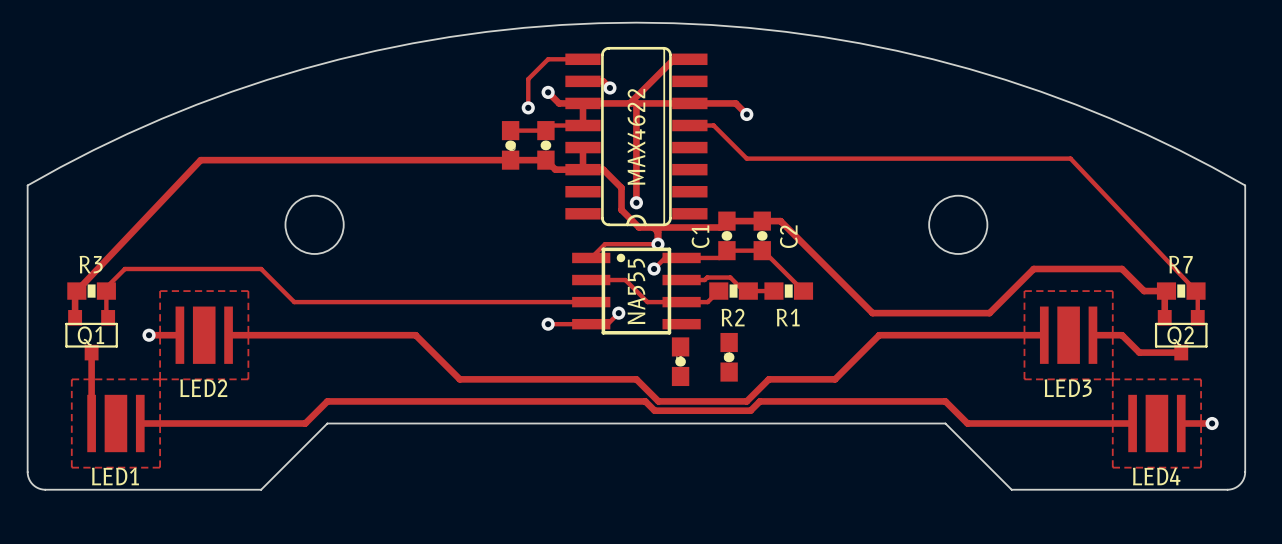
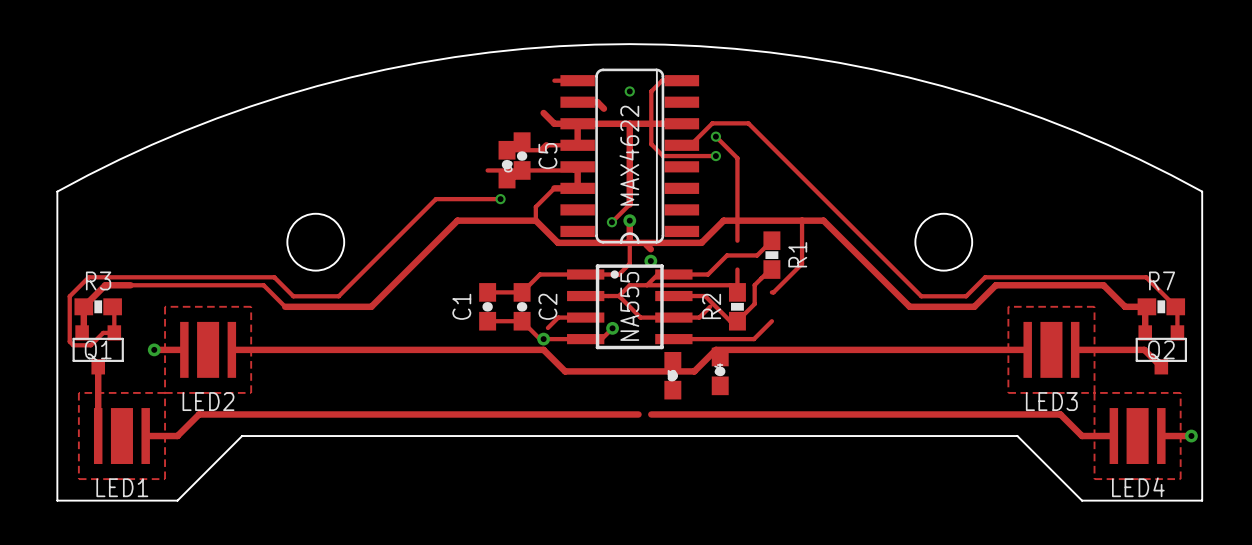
track: (559, 59) (548, 59) (528, 79) (528, 107) -> none
track: (673, 59) (629, 103) -> (666, 80) (662, 80) (651, 91) (651, 144) (663, 156) (715, 156)
via: none -> (629, 91)
via: (609, 87) -> none
via: (548, 92) -> none
track: (689, 103) (735, 103) (746, 114) -> none
via: (528, 107) -> none
via: (746, 114) -> none
track: none -> (715, 136) (737, 158) (737, 240)
via: none -> (715, 136)
track: (698, 125) (713, 125) (746, 158) (1070, 158) (1196, 291) -> (690, 145) (712, 123) (748, 123) (921, 296) (966, 296) (985, 277) (1146, 277) (1175, 306)
C5: none -> (522, 156)
via: none -> (715, 156)
part: (545, 145) -> none
track: none -> (577, 166) (574, 170) (487, 170)
track: (559, 169) (555, 169) (545, 160) (200, 160) (75, 292) (75, 317) -> (554, 188) (535, 206) (535, 220)
track: (583, 169) (603, 169) (621, 187) (621, 209) (639, 227) (720, 227) (726, 221) (780, 221) (872, 313) (989, 313) (1033, 268) -> (535, 220) (558, 242) (701, 242) (723, 220) (823, 220) (909, 306) (974, 306) (995, 285) (1017, 285)
track: none -> (500, 199) (435, 199) (338, 296) (293, 296) (274, 277) (88, 277) (69, 296) (69, 341) (73, 345) (90, 345) (103, 332) (114, 332) (114, 308) (112, 306)
via: none -> (500, 199)
track: (636, 186) (636, 202) -> (629, 204) (611, 222)
track: none -> (629, 220) (629, 263) (619, 274) (539, 274) (522, 292) (487, 292)
track: none -> (802, 220) (802, 263) (771, 292)
via: none -> (611, 222)
track: (658, 227) (657, 244) (604, 244) (591, 257) -> none
C1 position: (726, 235) -> (487, 306)
C2 position: (762, 235) -> (522, 306)
track: none -> (737, 269) (737, 292) (730, 285) (629, 285) (619, 296)
track: (716, 257) (719, 257) (726, 250) (763, 250) (803, 291) -> (707, 274) (727, 255) (757, 255) (771, 240)
track: (124, 268) (101, 292) (106, 291) (106, 316) (108, 317) -> (130, 285) (105, 285) (83, 306) (83, 331) (82, 332)
via: (654, 268) -> none
track: (704, 280) (707, 277) (730, 277) (743, 291) (773, 291) -> (696, 296) (705, 296) (730, 321) (737, 321) (754, 303) (754, 285) (771, 269)
track: (283, 291) (294, 302) (563, 302) -> (285, 306) (371, 306) (457, 220) (535, 220)
R2 rotation: 0° (733, 291) -> 90° clockwise (737, 306)
R1 rotation: 0° (788, 291) -> 90° clockwise (771, 255)
R1 position: (788, 291) -> (771, 255)
track: none -> (558, 317) (547, 327)
track: none -> (487, 321) (522, 321) (539, 339) (543, 339)
track: none -> (771, 321) (754, 339) (673, 339)
R1 name position: R1 (788, 317) -> R1 (797, 254)
track: (415, 335) (459, 379) (636, 379) (658, 401) -> (414, 349) (543, 349) (565, 371) (694, 371) (715, 349) (866, 349)
track: (879, 335) (835, 379) (768, 379) (746, 401) -> none
track: (1122, 335) (1139, 352) (1181, 352) -> (1103, 349) (1144, 349) (1161, 366)
track: (327, 401) (305, 423) (172, 423) -> (328, 414) (199, 414) (177, 436)
track: (645, 401) (654, 410) (750, 410) (759, 401) -> (737, 414) (750, 414)
track: (945, 401) (967, 423) (1099, 423) -> (931, 414) (1060, 414) (1082, 436)
board edge: (327, 423) (261, 489) (172, 489) -> (328, 436) (242, 436) (177, 500)
board edge: (945, 423) (1011, 489) (1099, 489) -> (931, 436) (1017, 436) (1082, 500)
board edge: (49, 489) (40, 489) (34, 486) (27, 474) (27, 185) (93, 150) (161, 118) (231, 91) (303, 69) (375, 50) (449, 37) (561, 24) (636, 22) (711, 24) (823, 37) (896, 50) (969, 69) (1041, 91) (1110, 118) (1179, 150) (1245, 185) (1245, 474) (1238, 486) (1232, 489) (1223, 489) -> (57, 500) (57, 191) (119, 159) (184, 131) (250, 106) (317, 86) (385, 69) (454, 57) (559, 46) (629, 44) (700, 46) (804, 57) (874, 69) (942, 86) (1009, 106) (1075, 131) (1139, 159) (1202, 191) (1202, 500)

